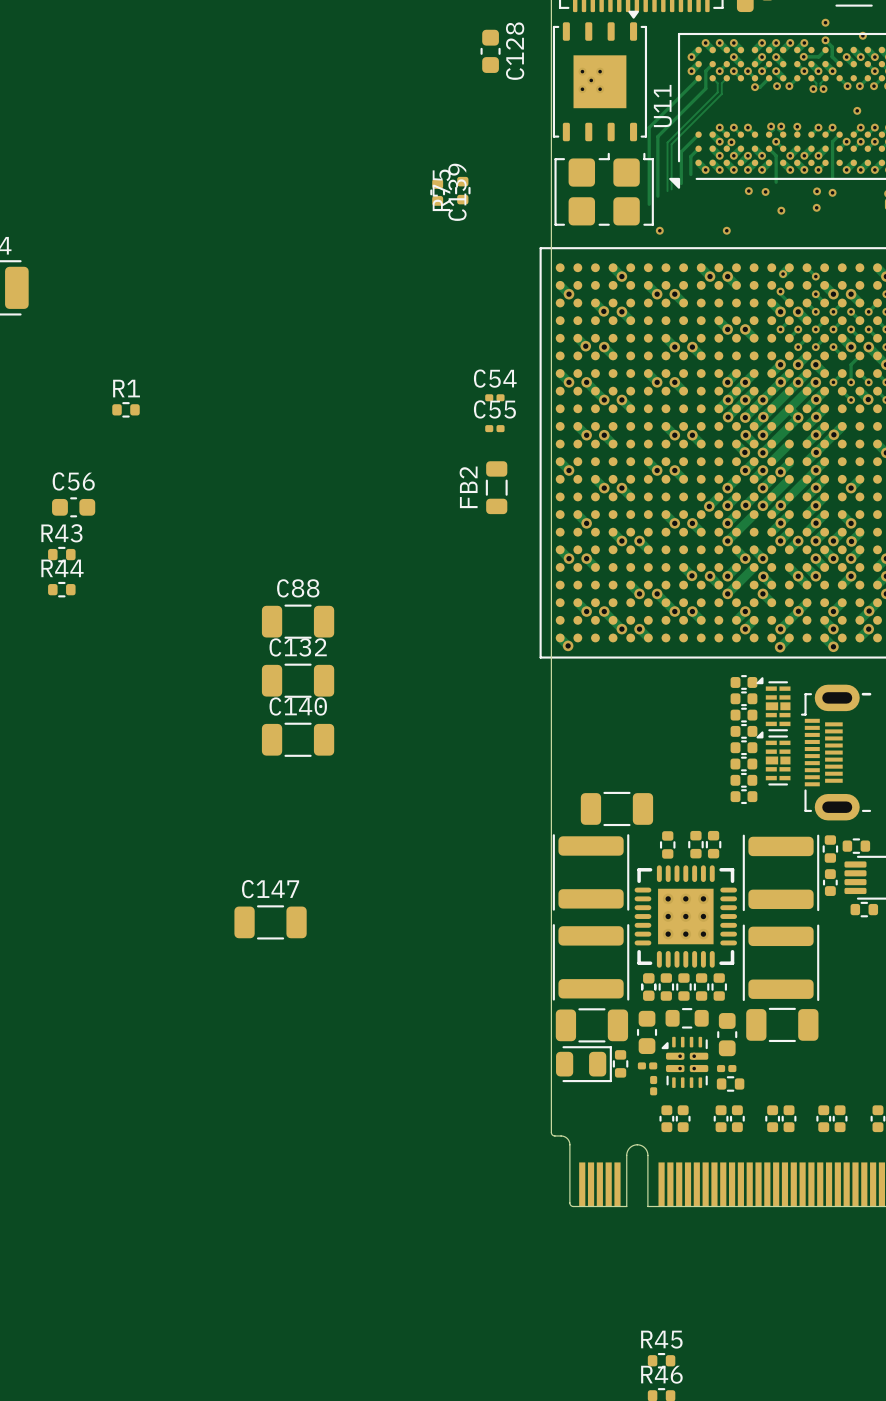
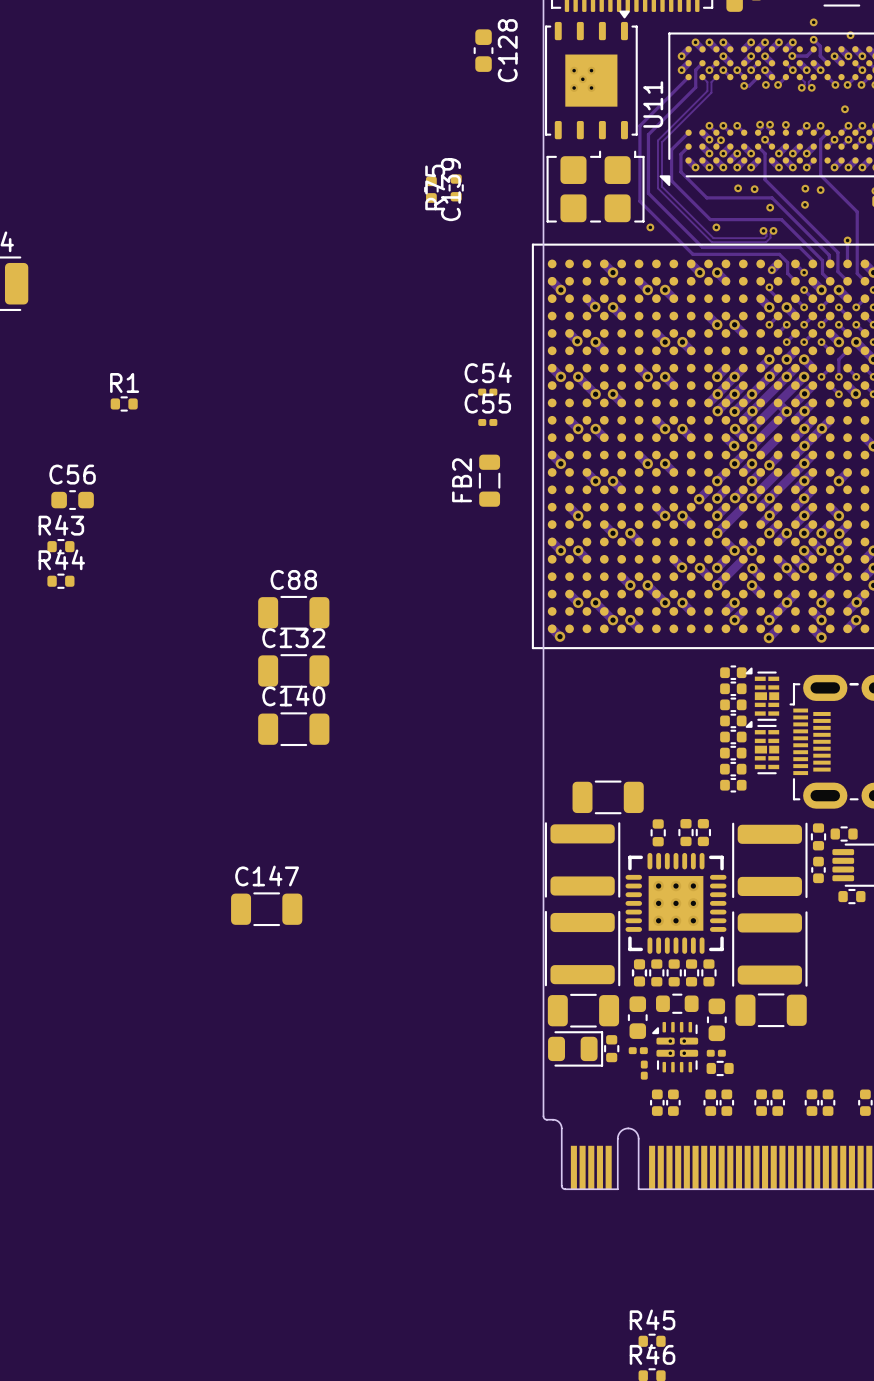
track: none -> (680, 171) (706, 197) (772, 197) (829, 255) (830, 263)
track: none -> (820, 175) (857, 211) (857, 273) (864, 281)
track: none -> (765, 179) (837, 252) (837, 271) (847, 281)
track: none -> (671, 180) (710, 219) (781, 219) (822, 260) (822, 273) (830, 281)
track: none -> (662, 186) (713, 238) (764, 238) (766, 233) (763, 230)
track: none -> (657, 188) (711, 242) (766, 242) (773, 230)
track: none -> (648, 193) (702, 247) (799, 247) (812, 260) (812, 263)
track: none -> (639, 201) (692, 254) (779, 254) (787, 262) (787, 273) (795, 281)
via: none -> (763, 230)
via: none -> (773, 230)
via: none -> (847, 240)
track: none -> (847, 240) (847, 263)

